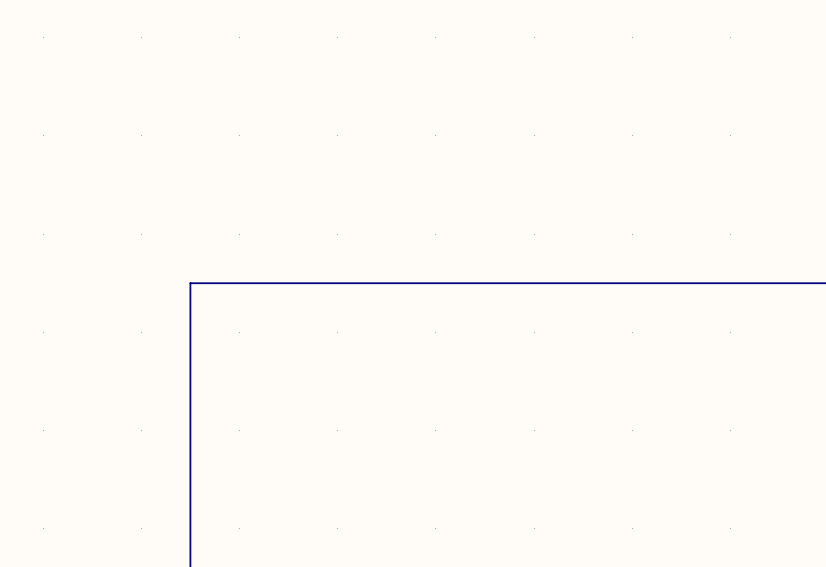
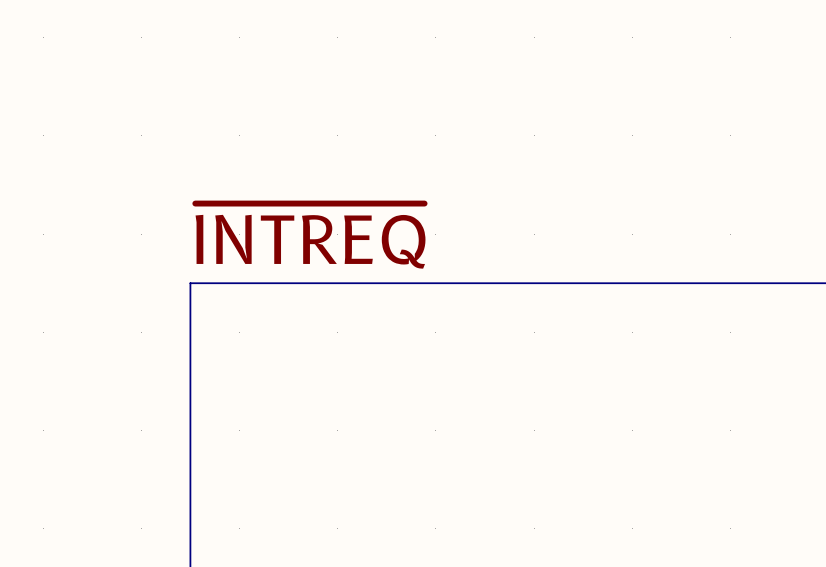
label: none -> ~{INTREQ} (310, 236)

